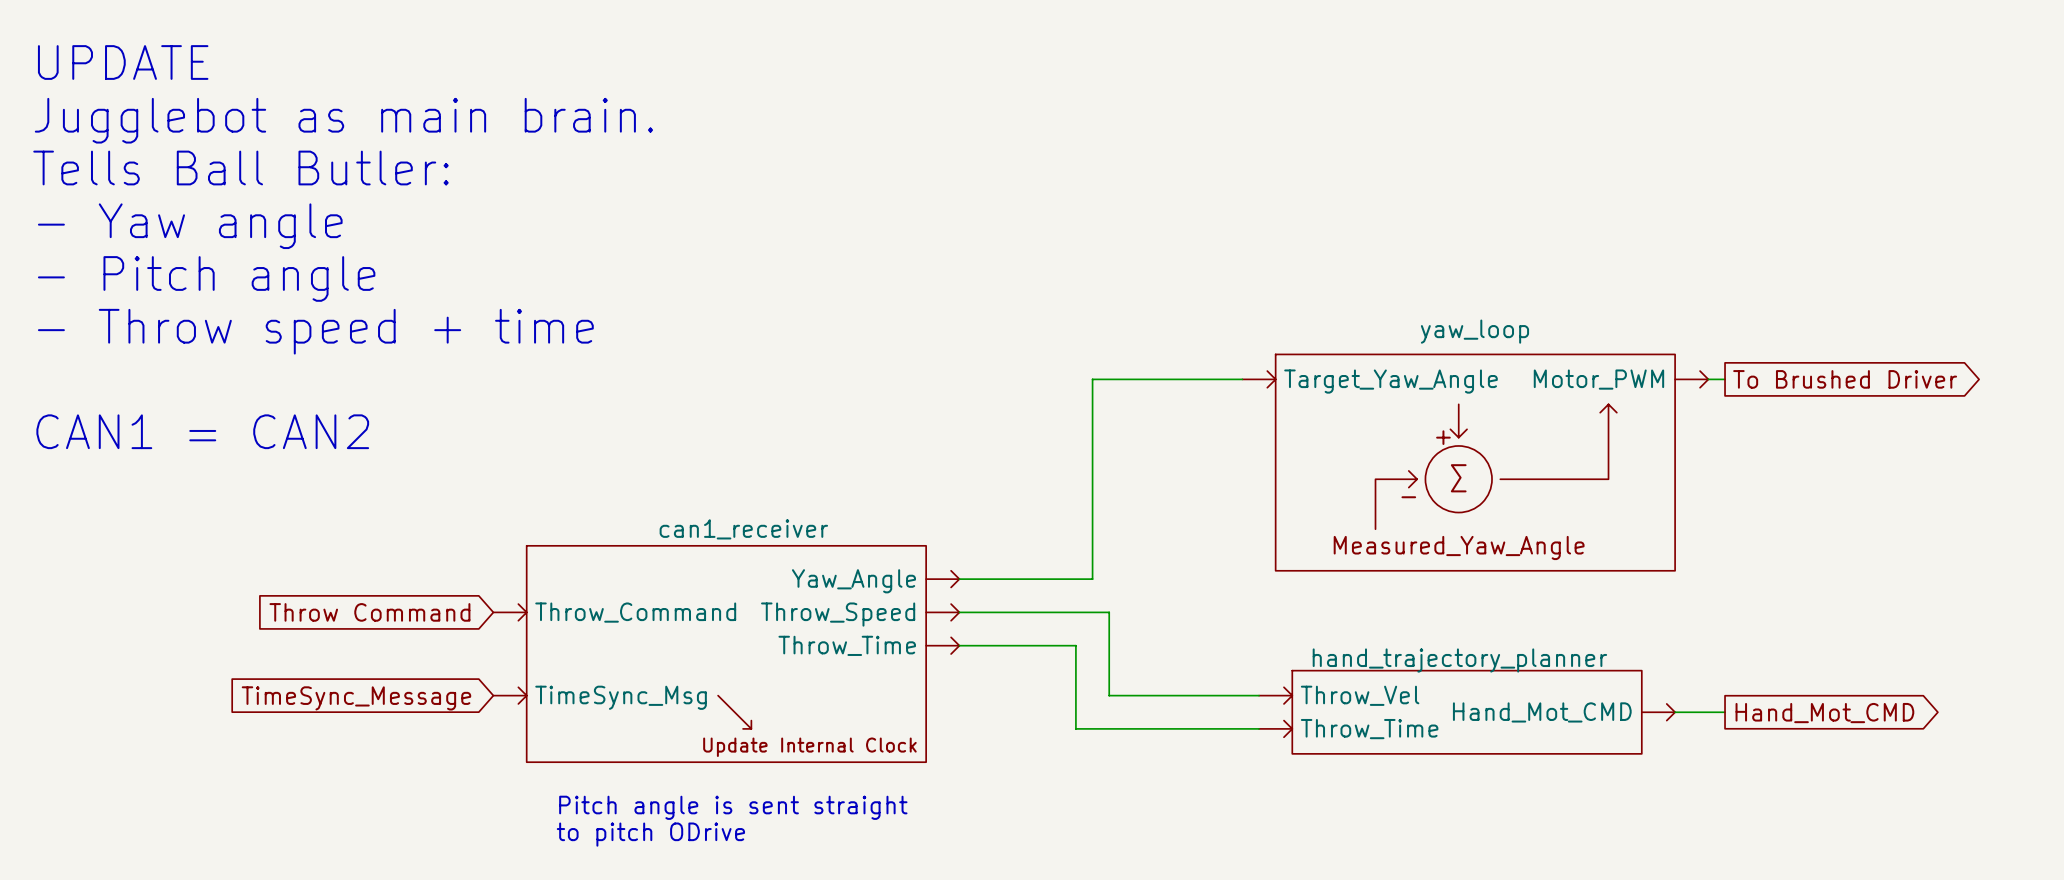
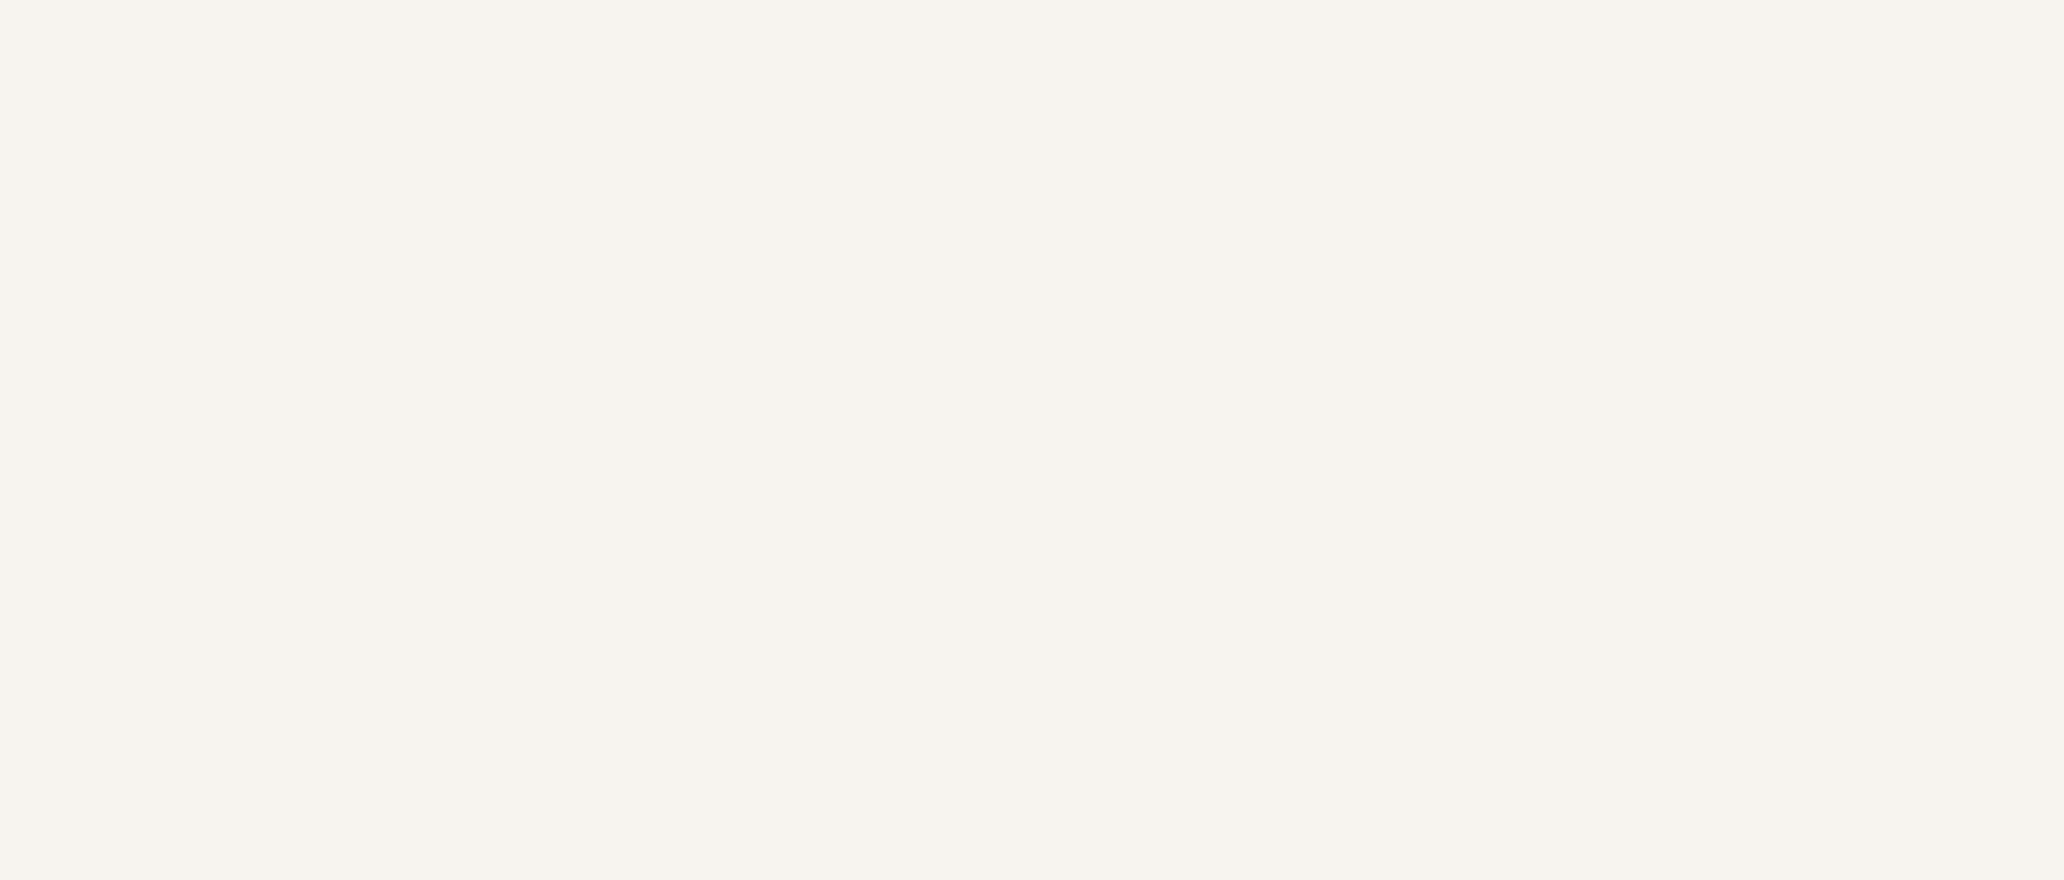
text: UPDATE (123, 62) -> none
text: Jugglebot as main brain. (343, 120) -> none
text: Tells Ball Butler: (240, 168) -> none
text: - Yaw angle (190, 226) -> none
text: - Pitch angle (206, 278) -> none
text: - Throw speed + time (315, 331) -> none
wire: (1242, 379) (1092, 379) (1092, 579) (959, 579) -> none
wire: (1708, 379) (1725, 379) -> none
global label: To Brushed Driver (1845, 379) -> none
text: CAN1 = CAN2 (202, 431) -> none
part: yaw_loop (1475, 462) -> none
global label: Throw Command (369, 612) -> none
wire: (959, 612) (1109, 612) (1109, 695) (1259, 695) -> none
wire: (959, 645) (1075, 645) (1075, 728) (1259, 728) -> none
part: can1_receiver (726, 654) -> none
global label: TimeSync_Message (356, 698) -> none
part: hand_trajectory_planner (1467, 712) -> none
wire: (1675, 712) (1725, 712) -> none
global label: Hand_Mot_CMD (1824, 713) -> none
text: Pitch angle is sent straight (733, 807) -> none
text: to pitch ODrive (650, 834) -> none

